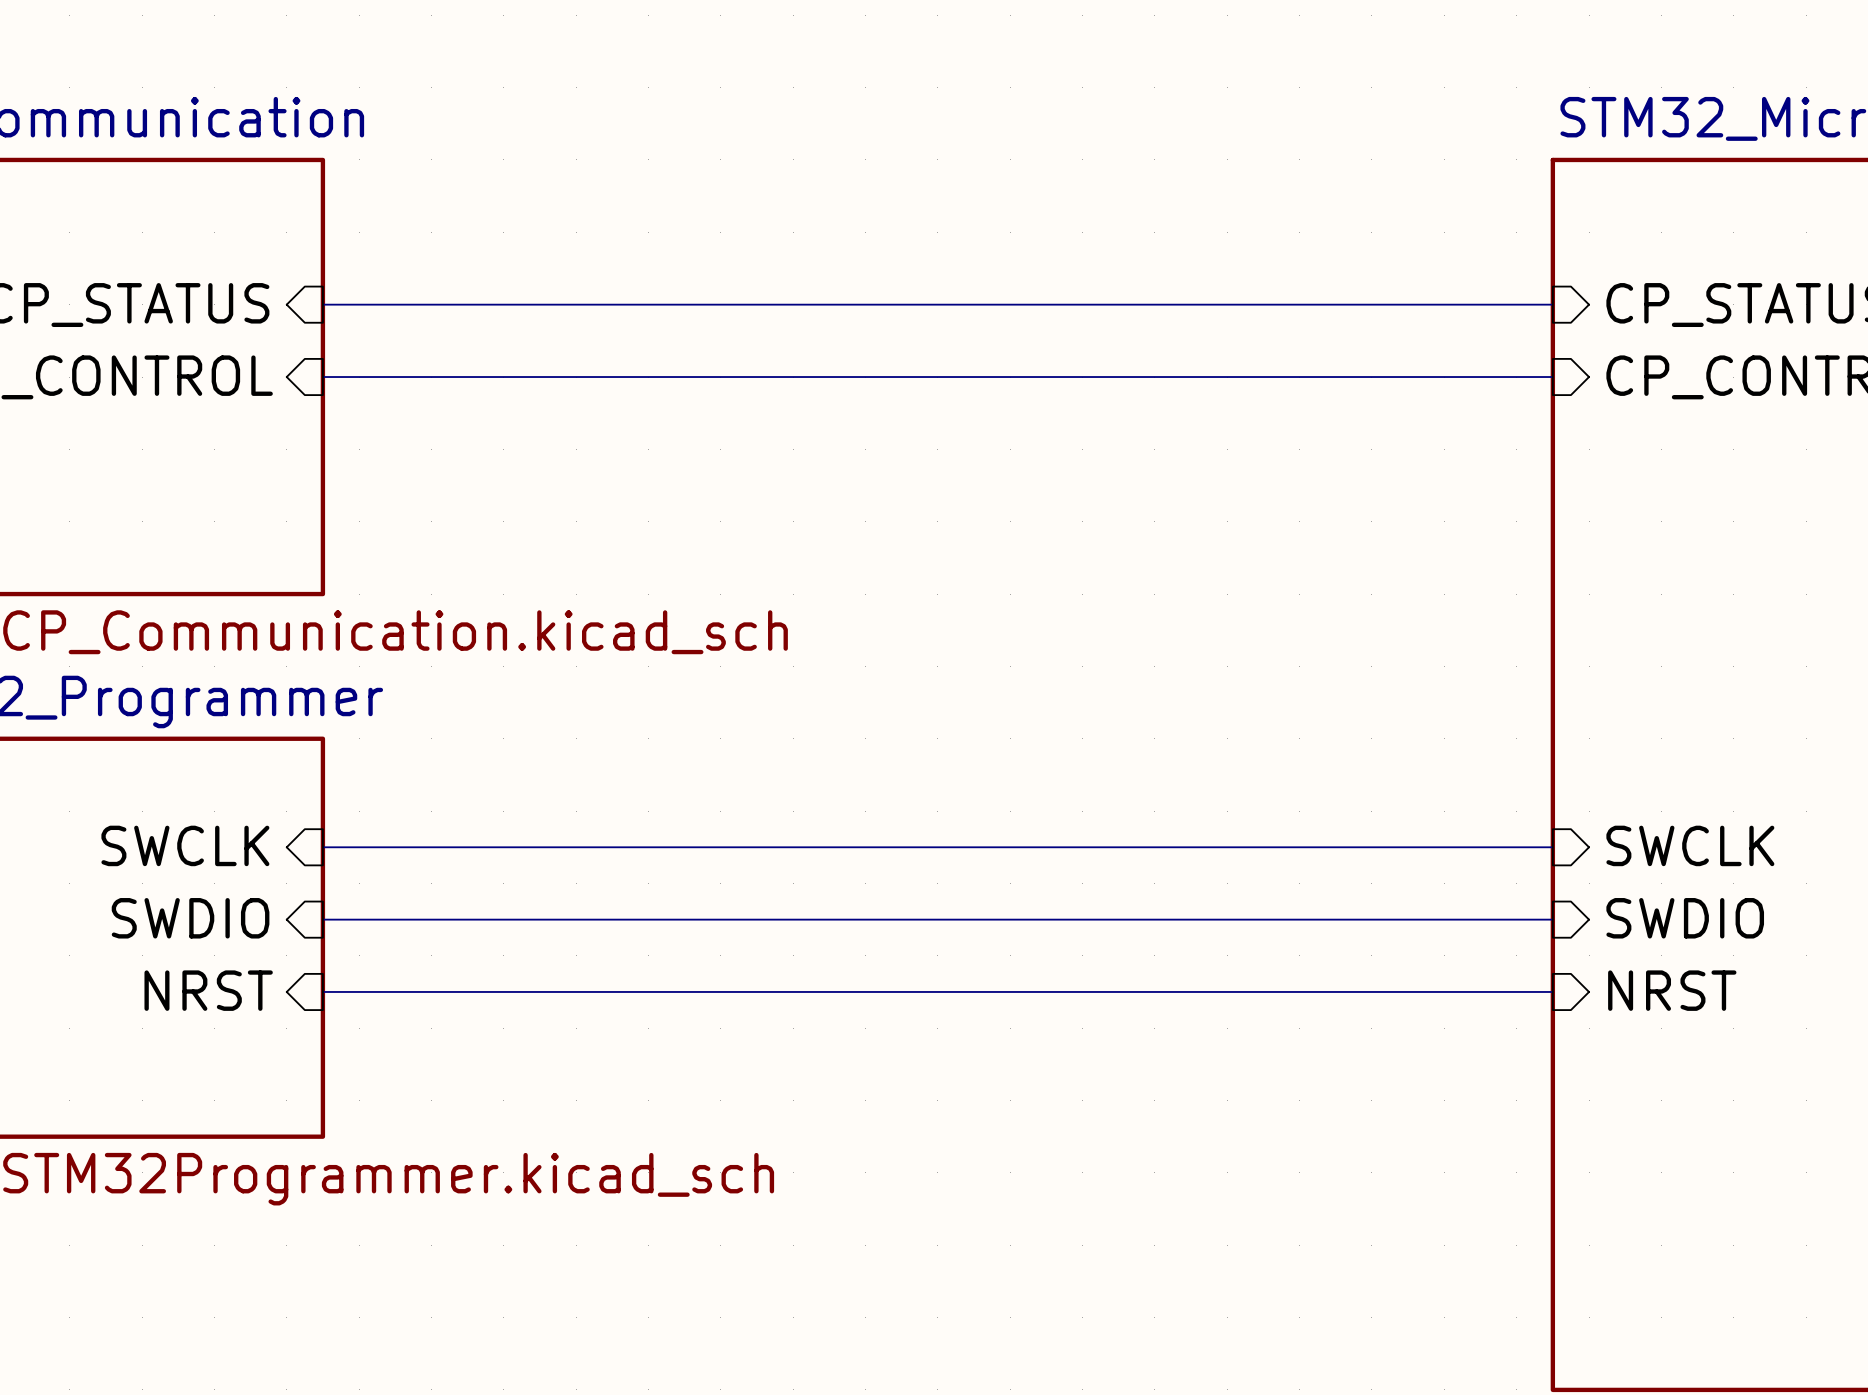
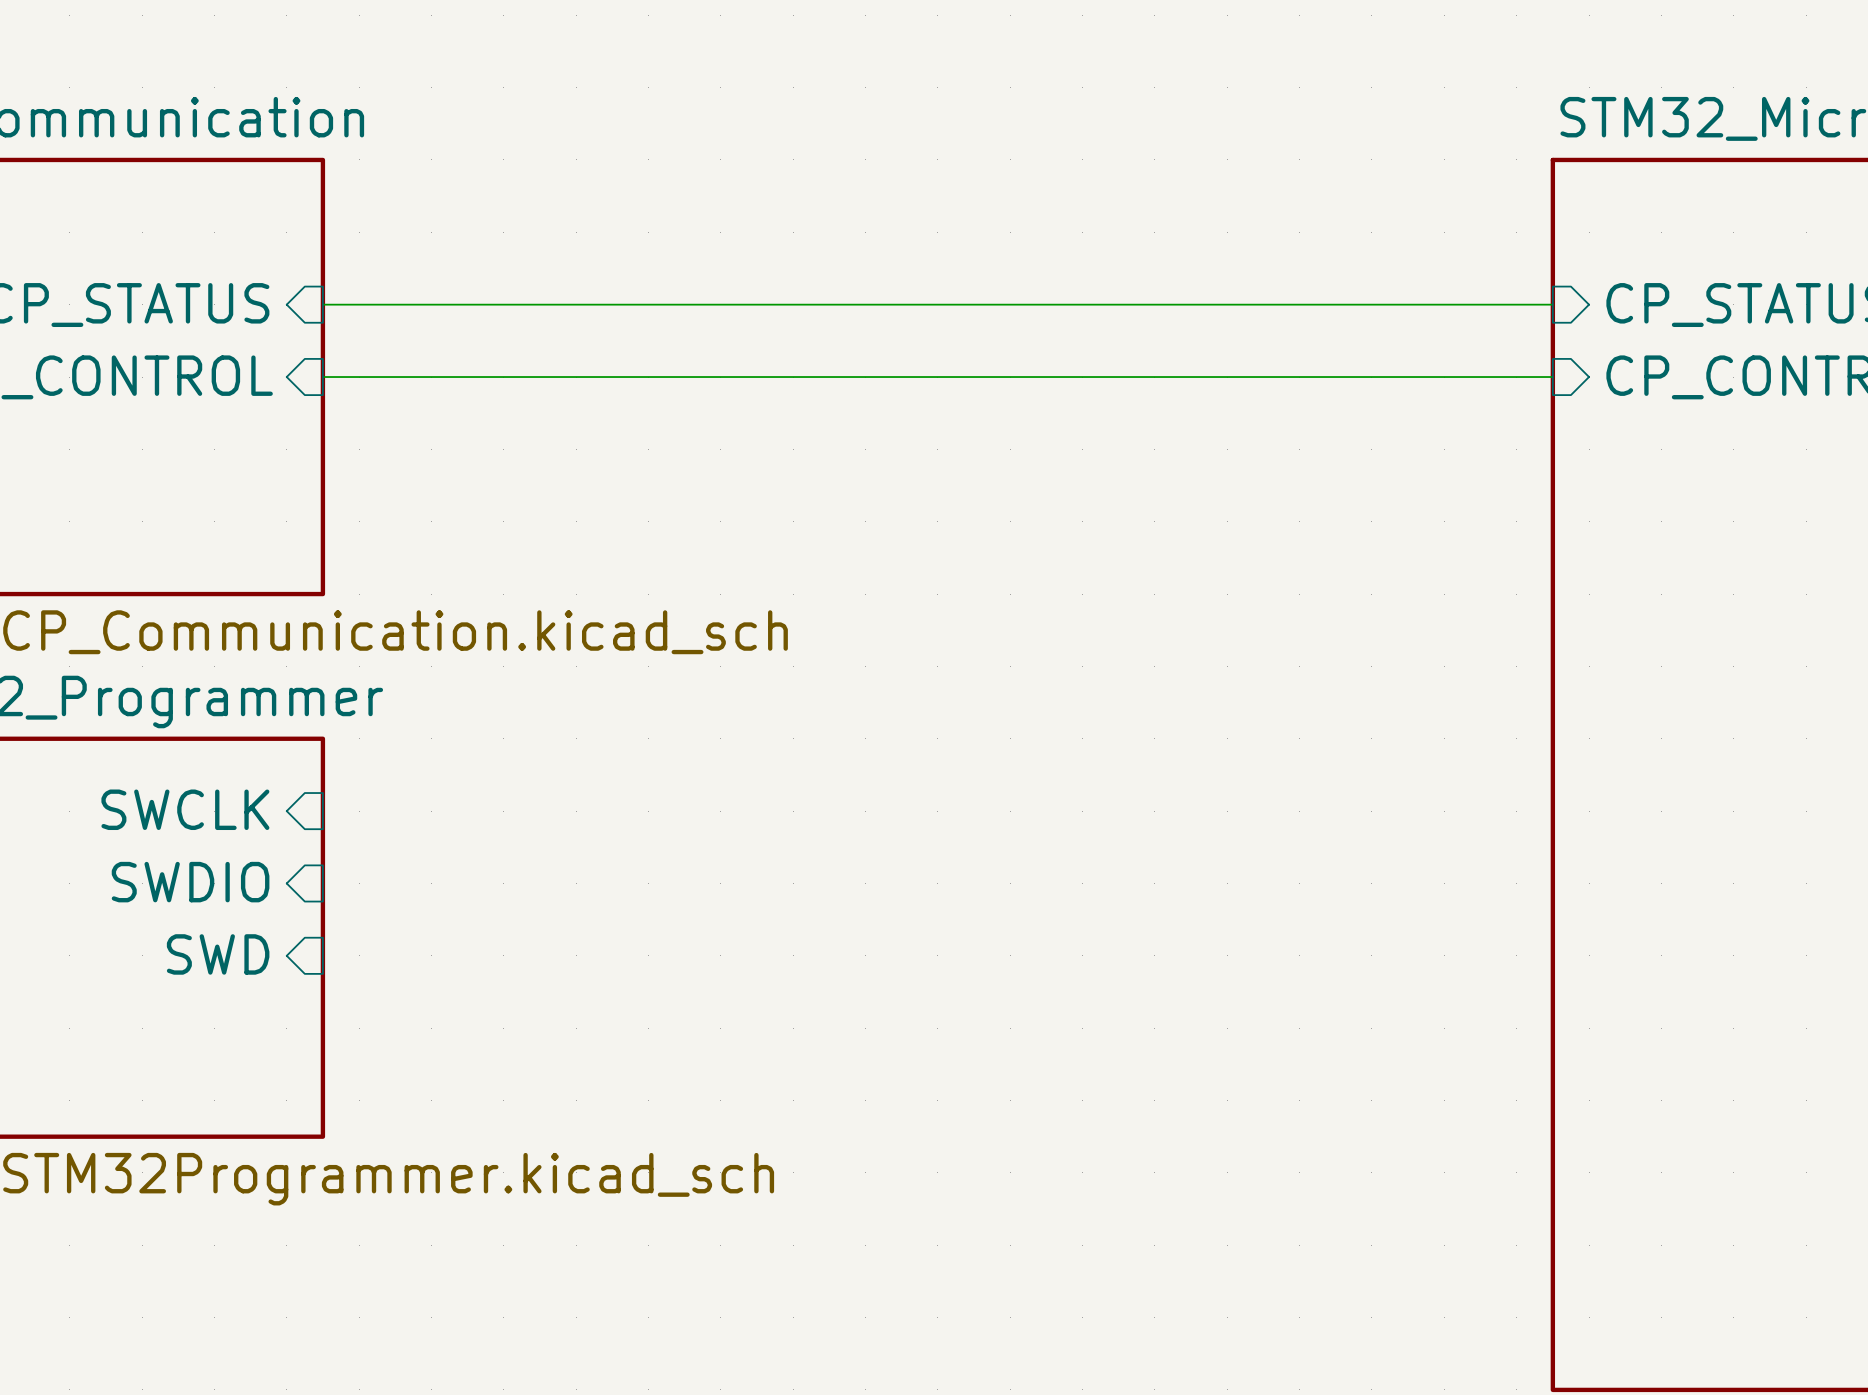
sheet pin position: SWCLK (185, 845) -> SWCLK (185, 809)
sheet pin: SWCLK (1690, 845) -> none
wire: (322, 847) (1552, 847) -> none
sheet pin position: SWDIO (190, 918) -> SWDIO (190, 882)
sheet pin: SWDIO (1685, 918) -> none
wire: (322, 919) (1552, 919) -> none
sheet pin: none -> SWD (218, 954)
sheet pin: NRST (208, 990) -> none
sheet pin: NRST (1672, 990) -> none
wire: (322, 991) (1552, 991) -> none

